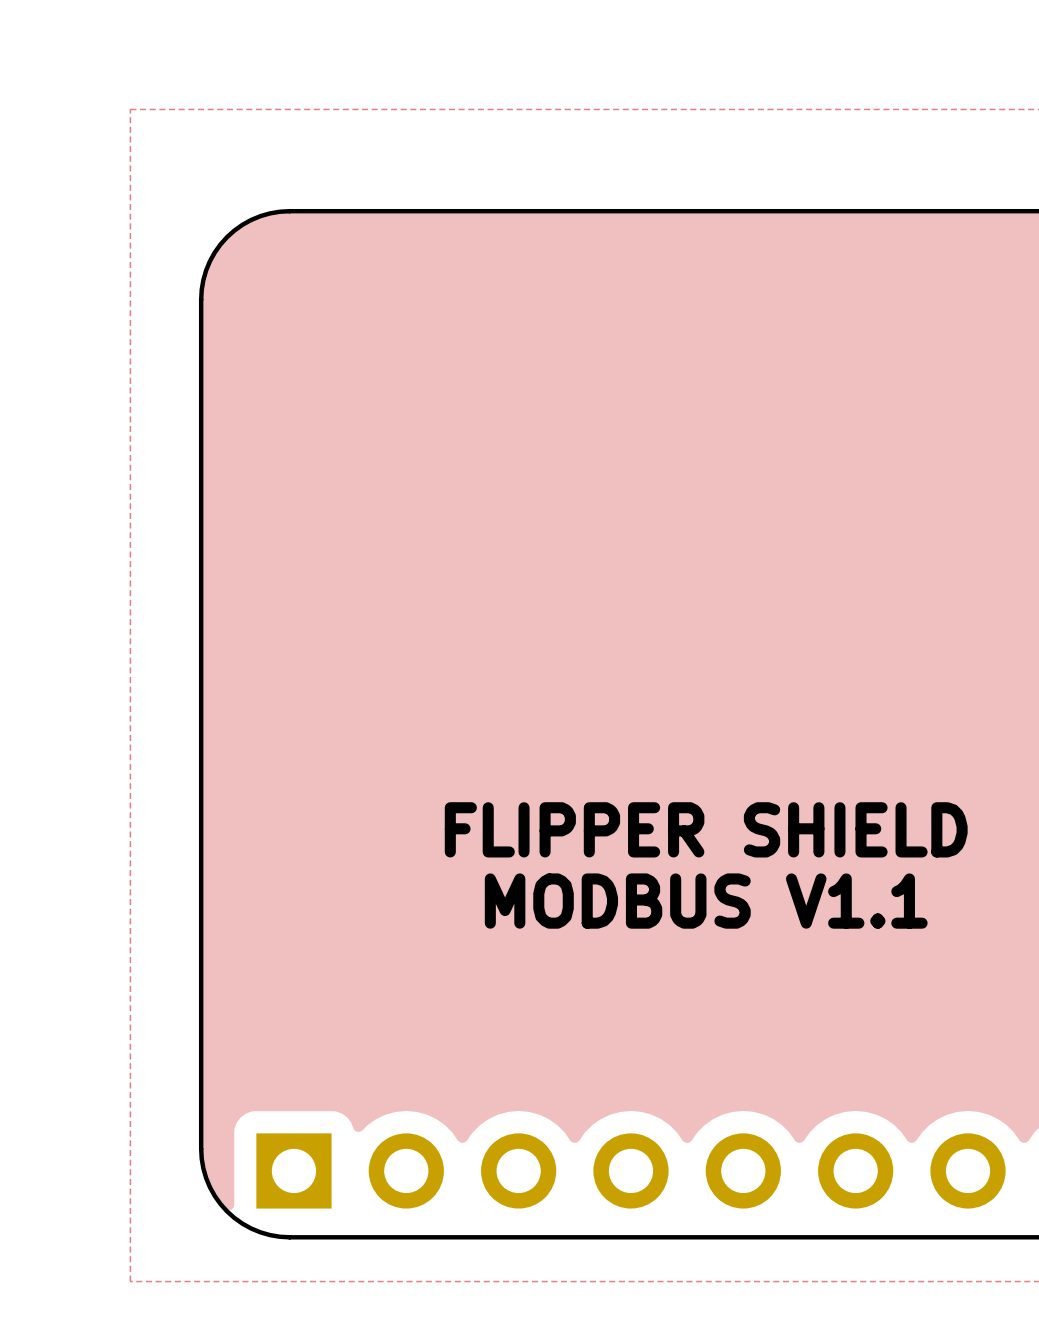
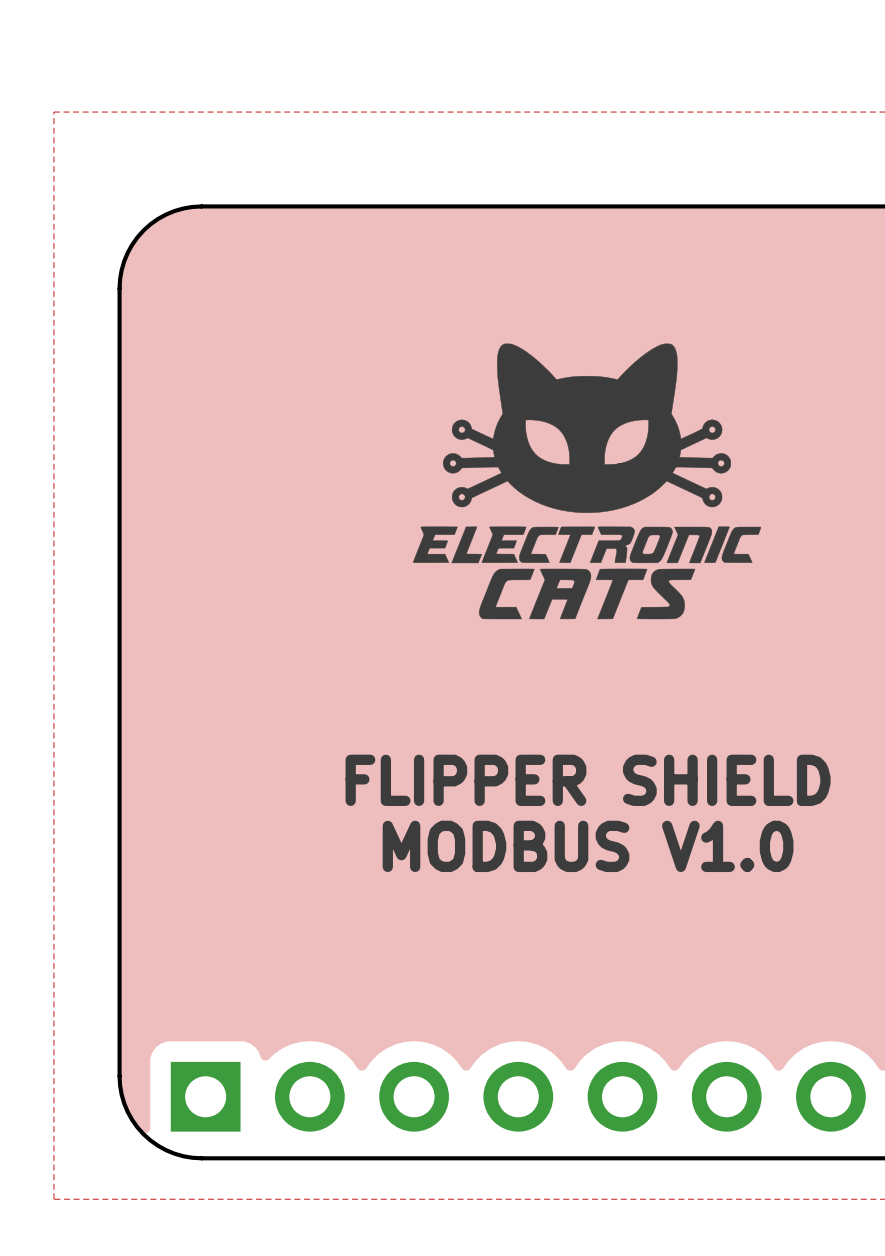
drawing: none -> [413, 343, 761, 620]
text: MODBUS V1.1 (706, 901) -> MODBUS V1.0 (588, 846)

